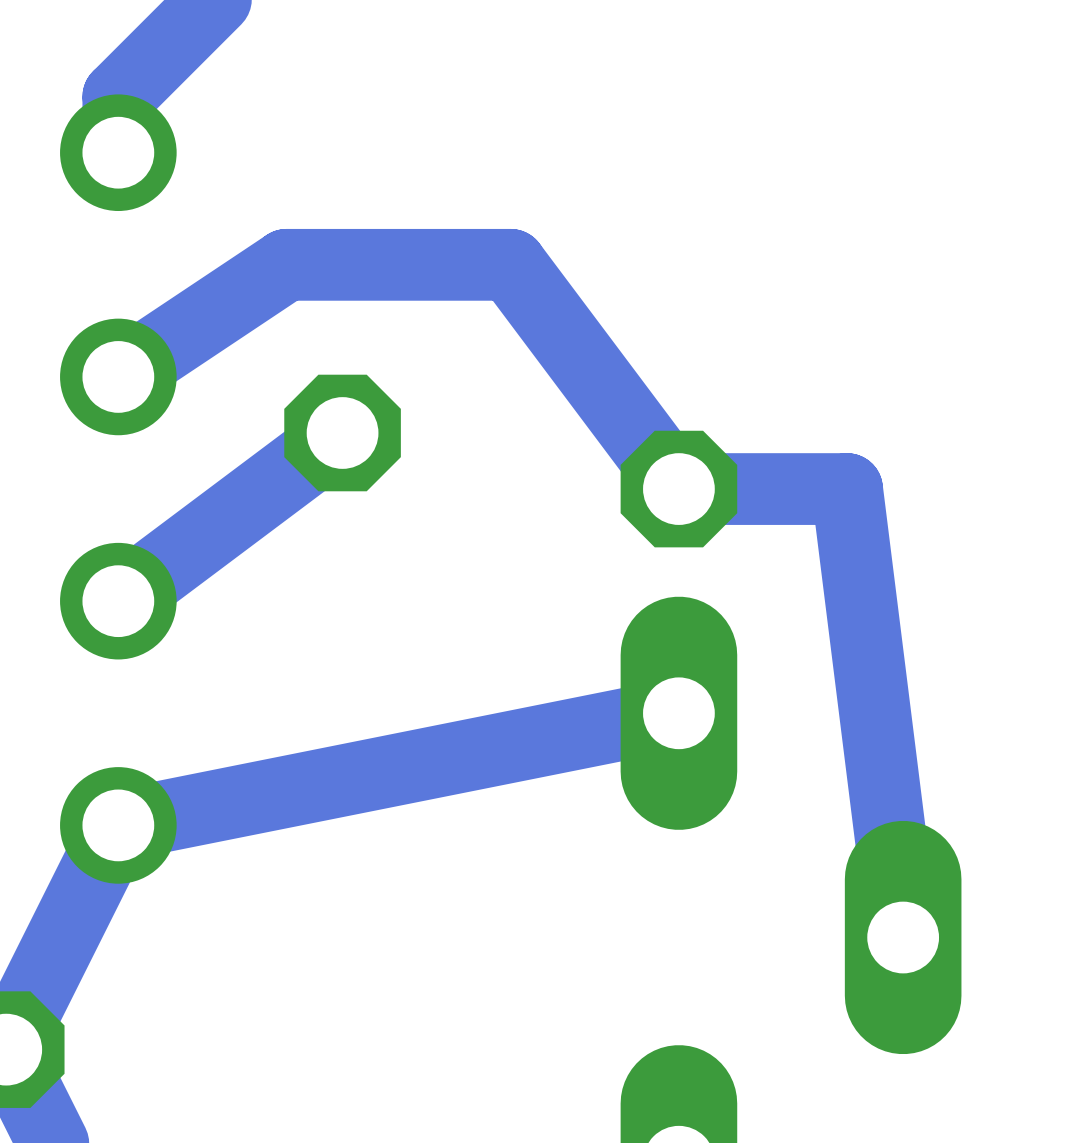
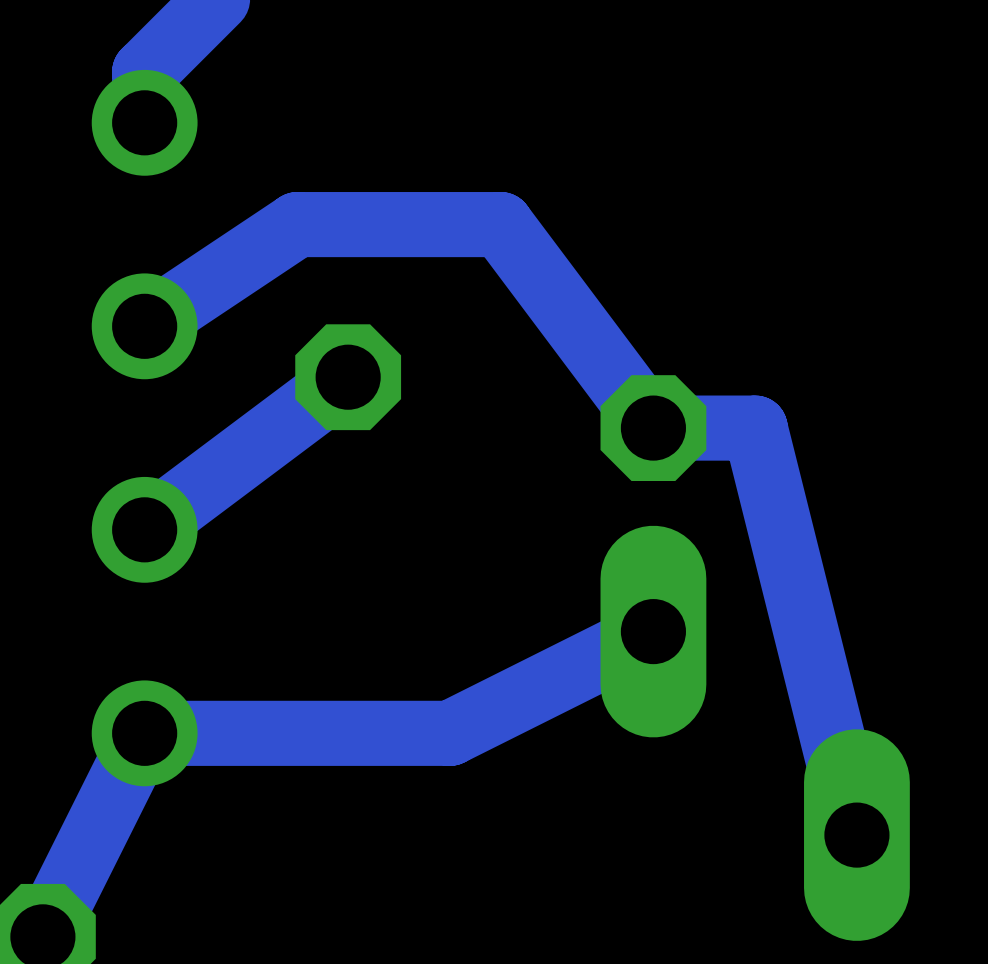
track: (791, 489) (847, 489) (903, 937) -> (755, 428) (856, 835)
track: (678, 713) (118, 825) -> (653, 631) (449, 733) (144, 733)

